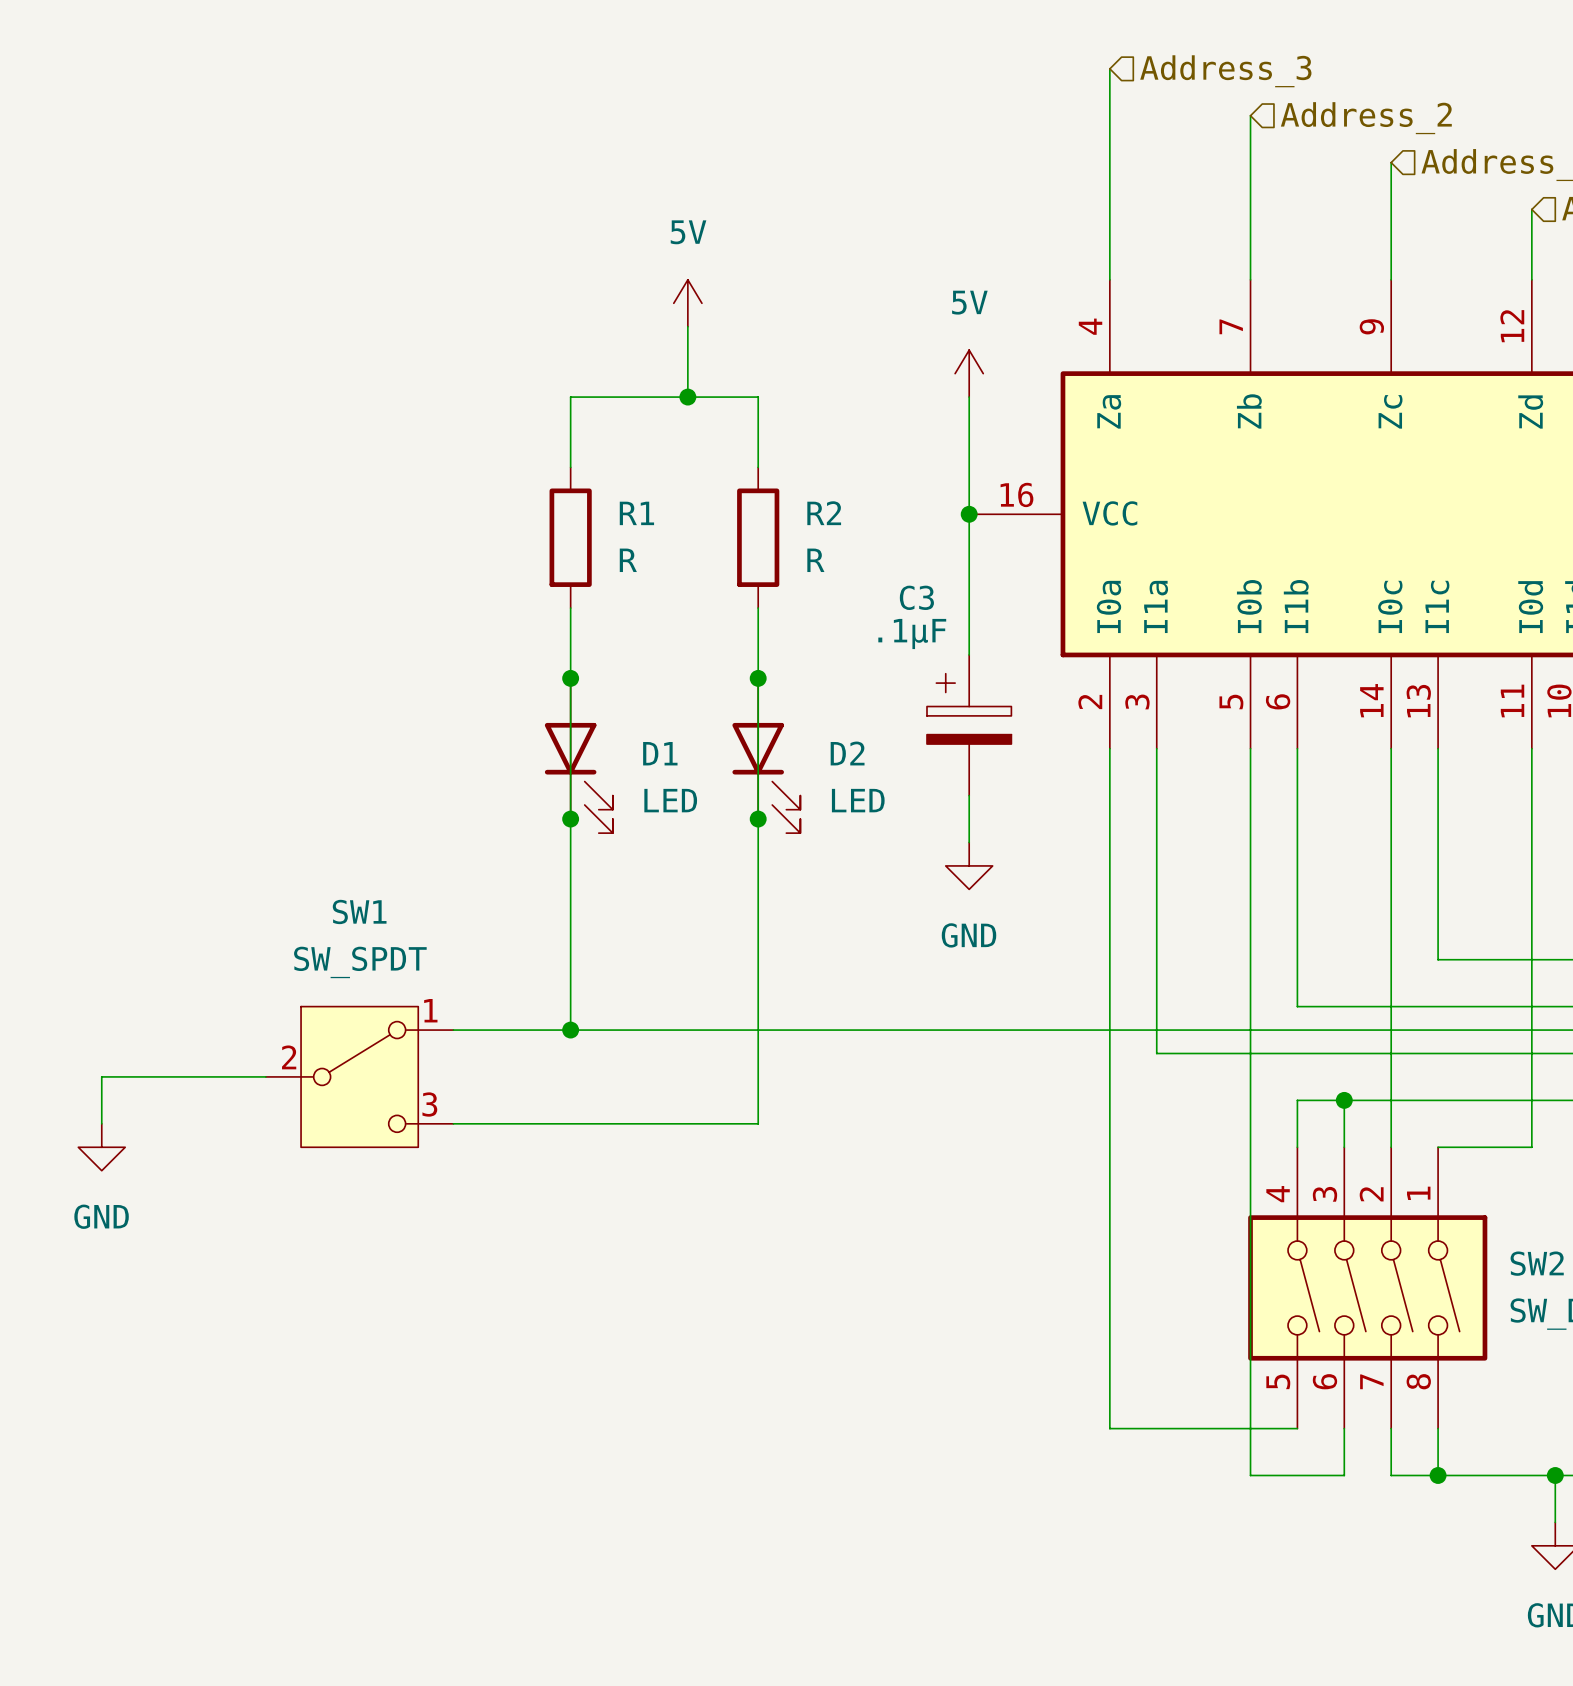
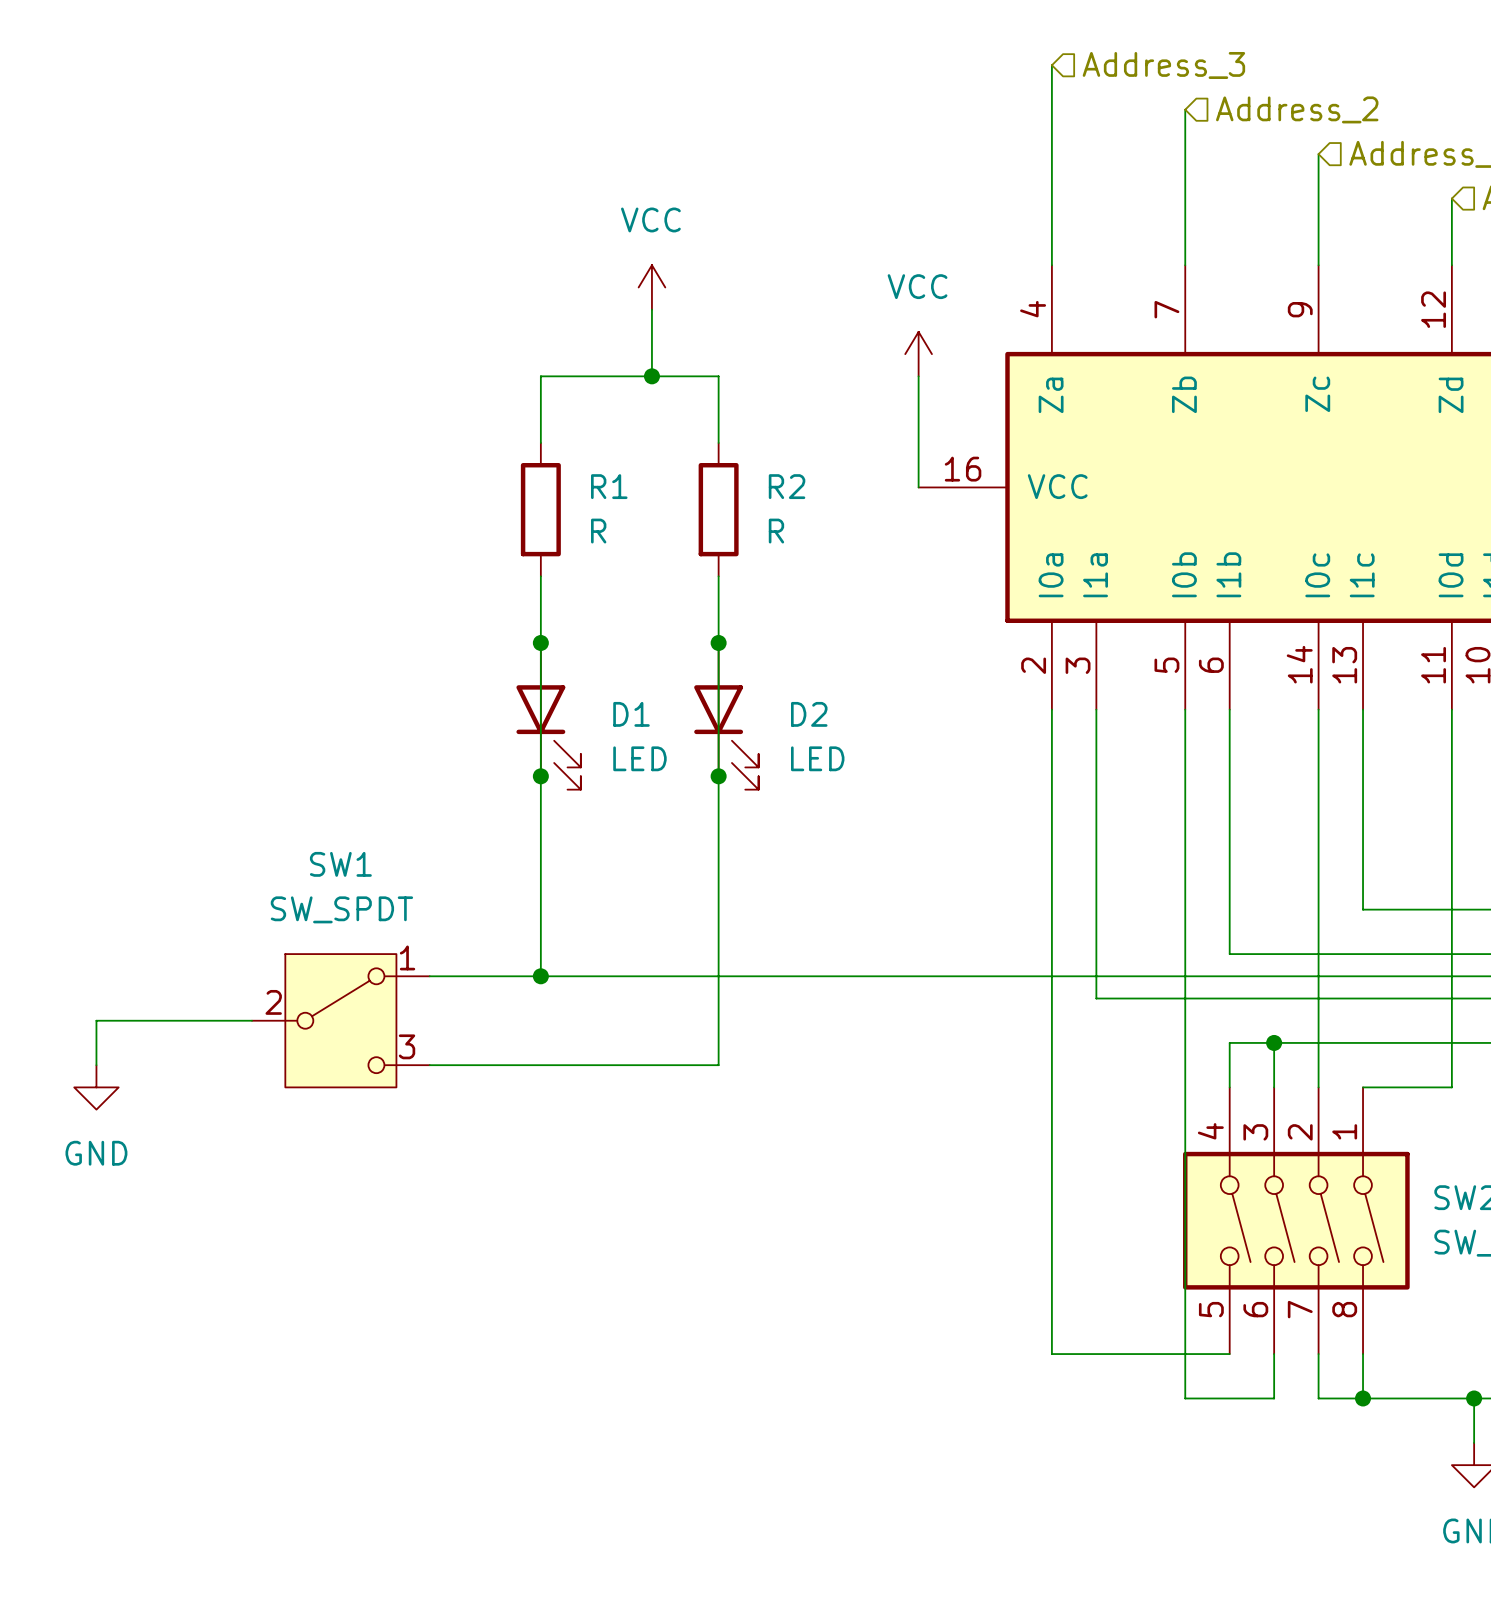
power symbol: 5V (687, 303) -> VCC (651, 287)
power symbol: 5V (969, 373) -> VCC (918, 354)
wire: (969, 514) (969, 654) -> none
junction: (969, 514) -> none
C3: .1µF (969, 725) -> none
wire: (969, 795) (969, 842) -> none
power symbol: GND (969, 865) -> none

